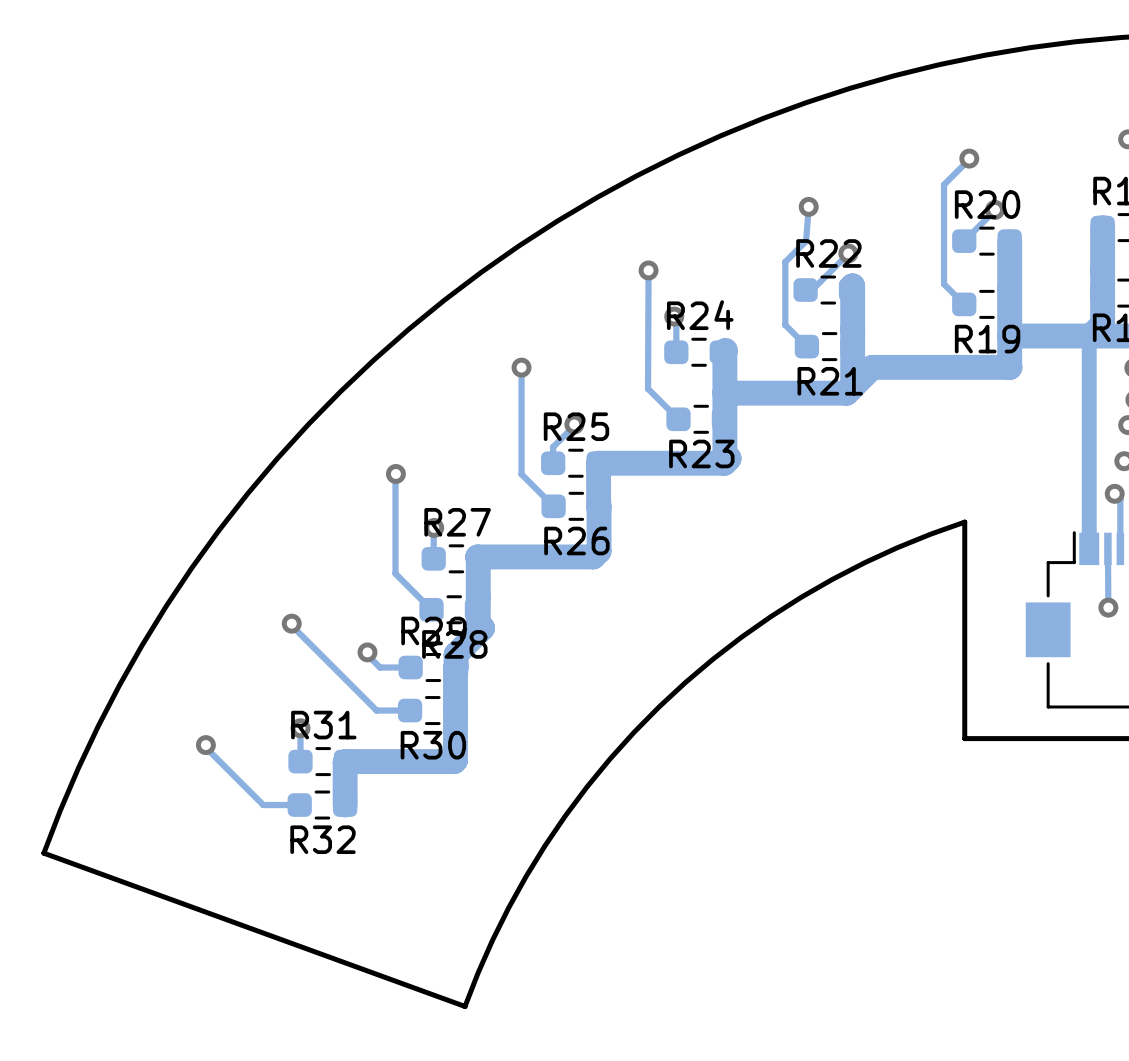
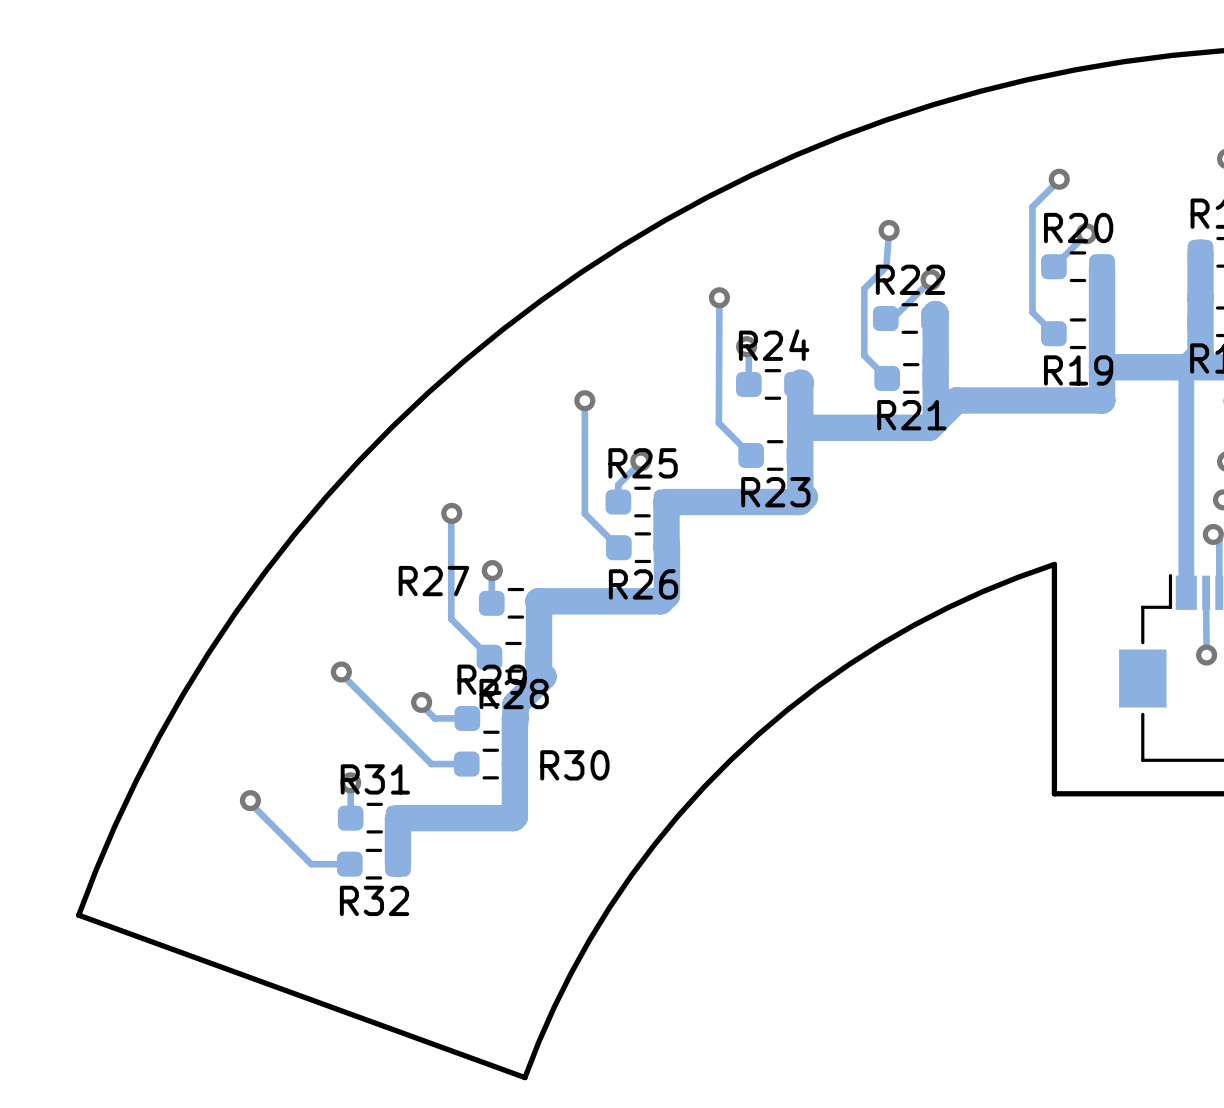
R27 name position: R27 (457, 522) -> R27 (433, 581)
R30 name position: R30 (433, 745) -> R30 (574, 765)

